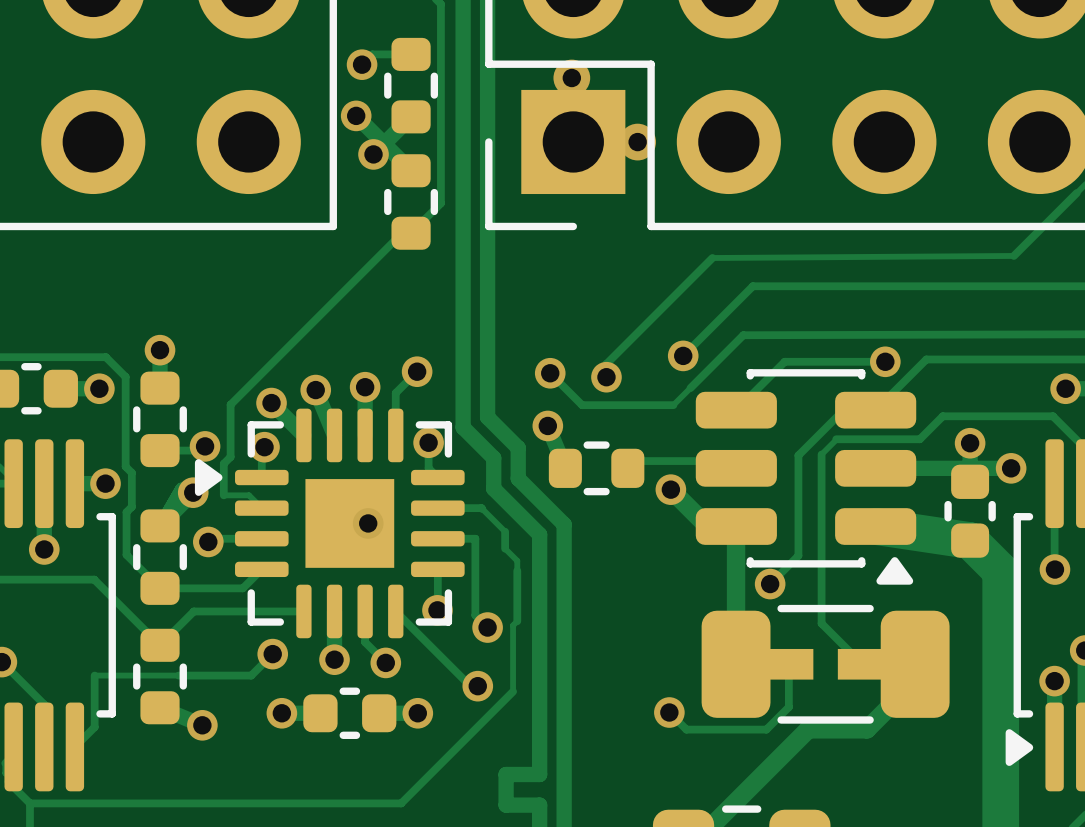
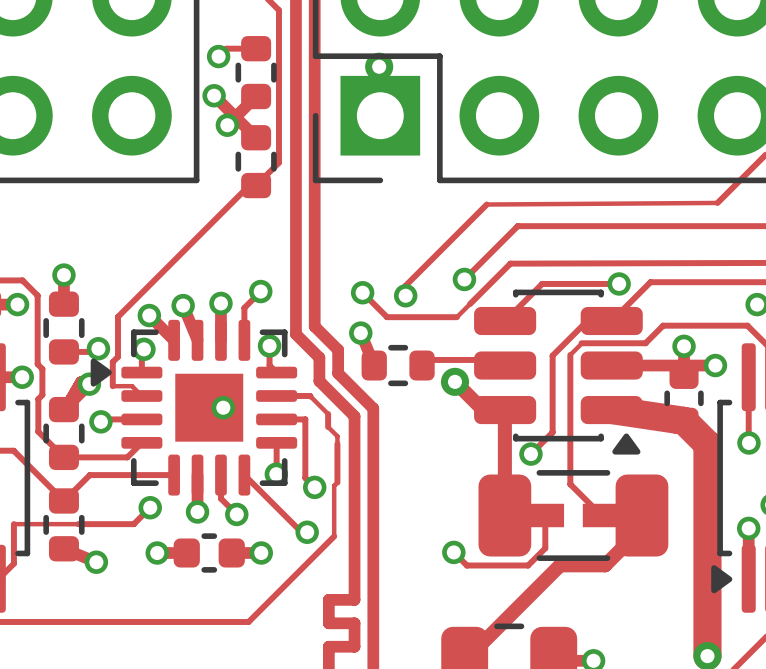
via position: (637, 142) -> (454, 381)
via: (670, 489) -> none

